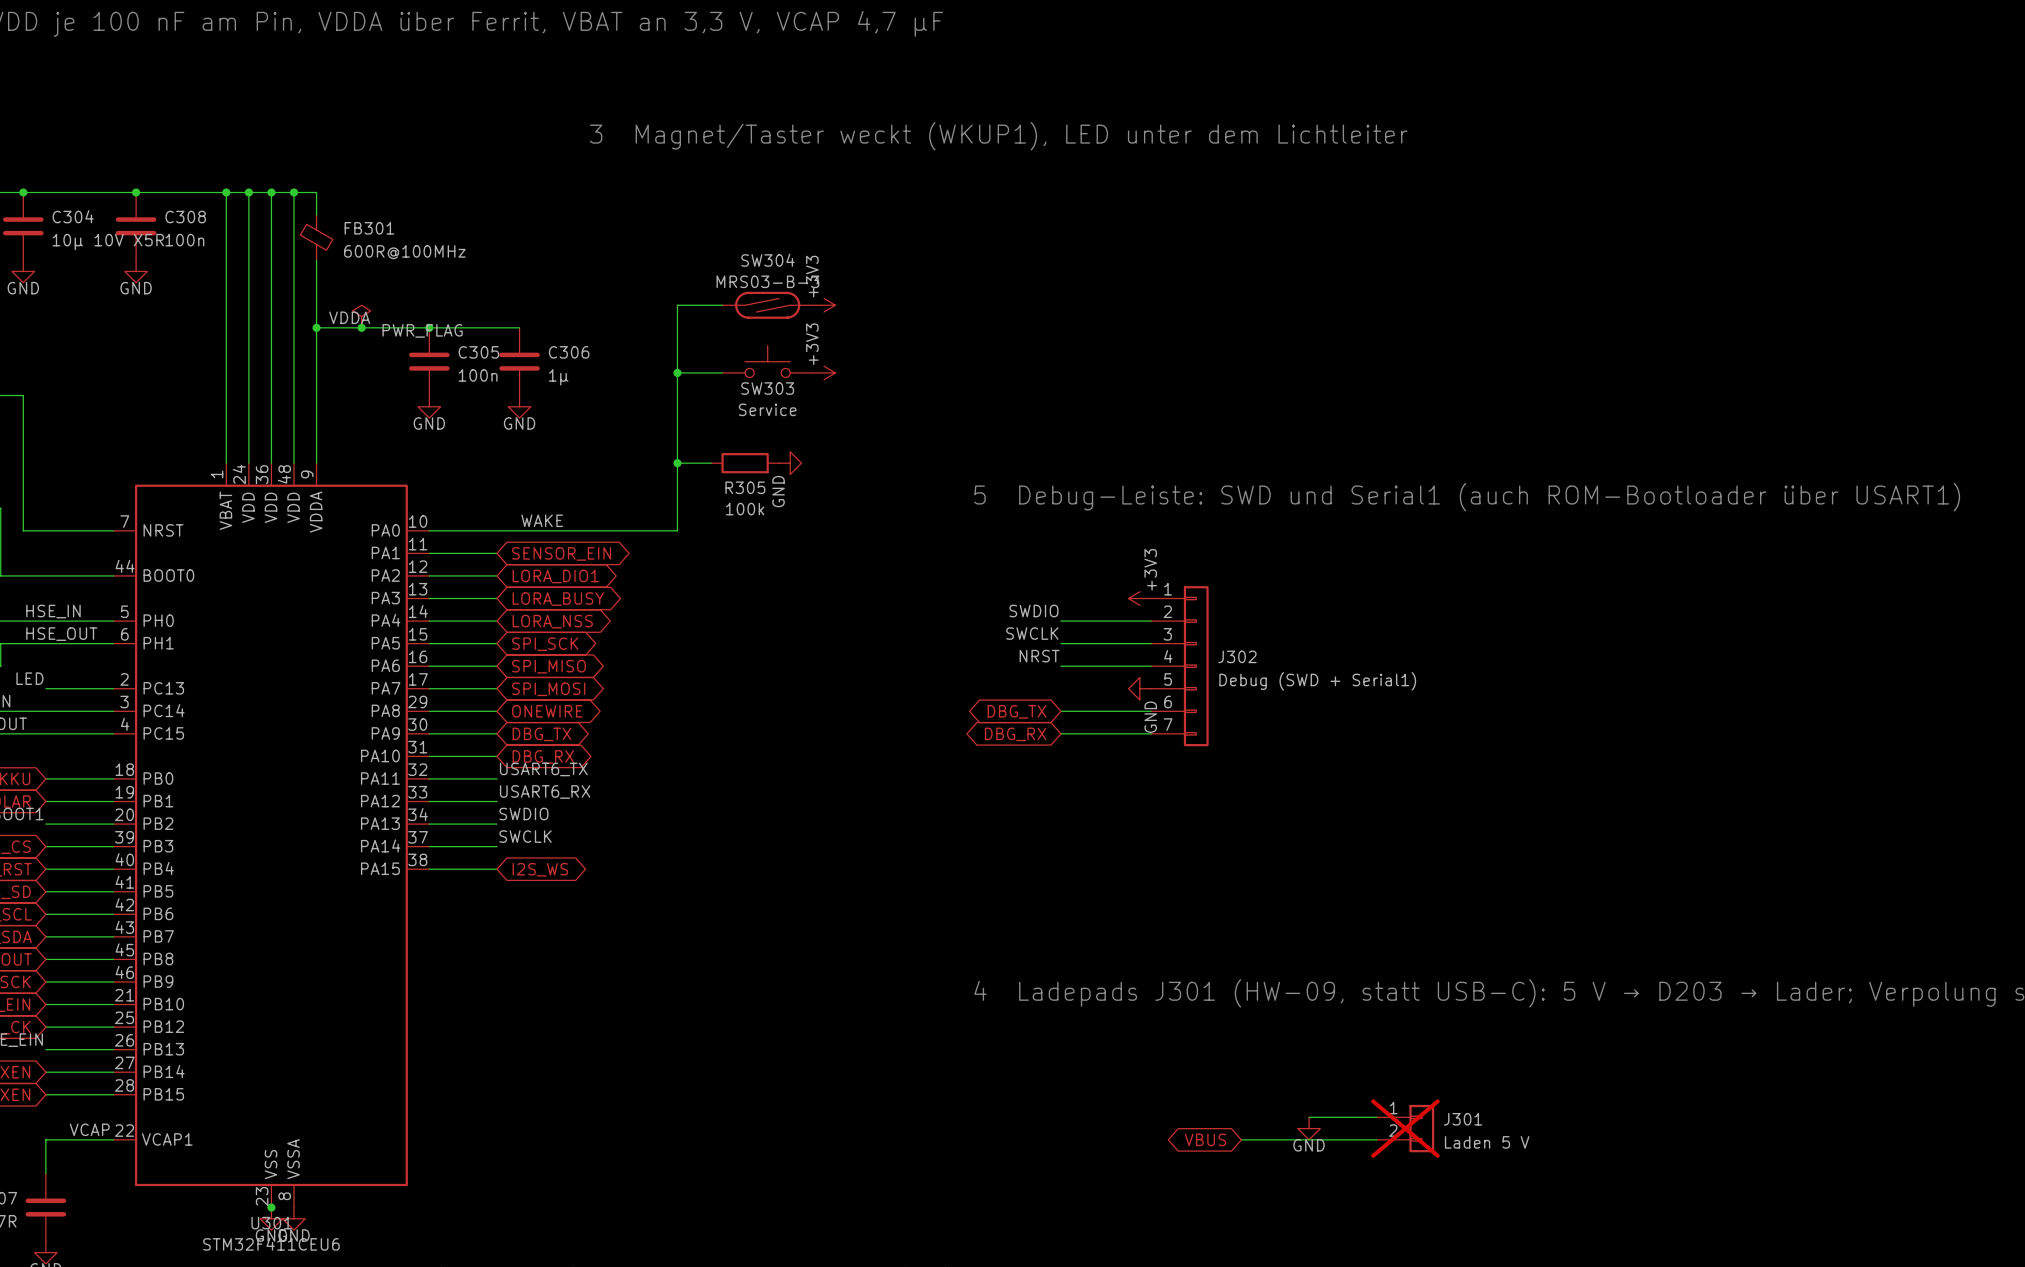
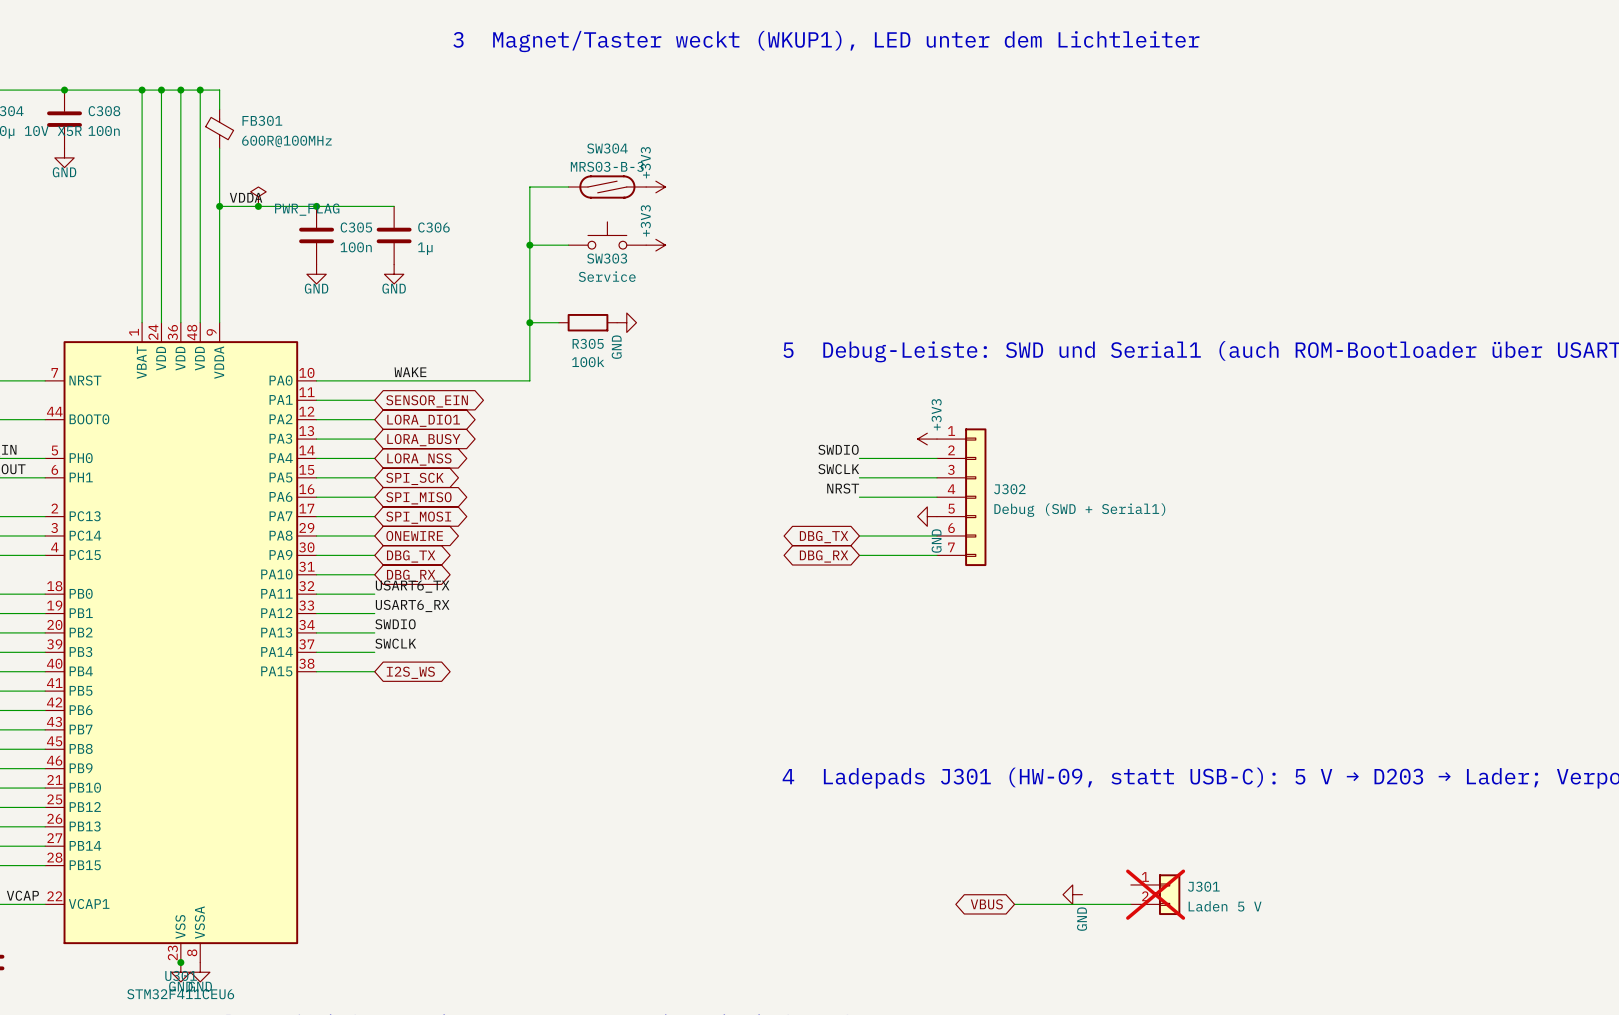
wire: (1309, 1117) (1376, 1117) -> none
power symbol rotation: 0° (1309, 1128) -> 90° clockwise (1072, 894)

